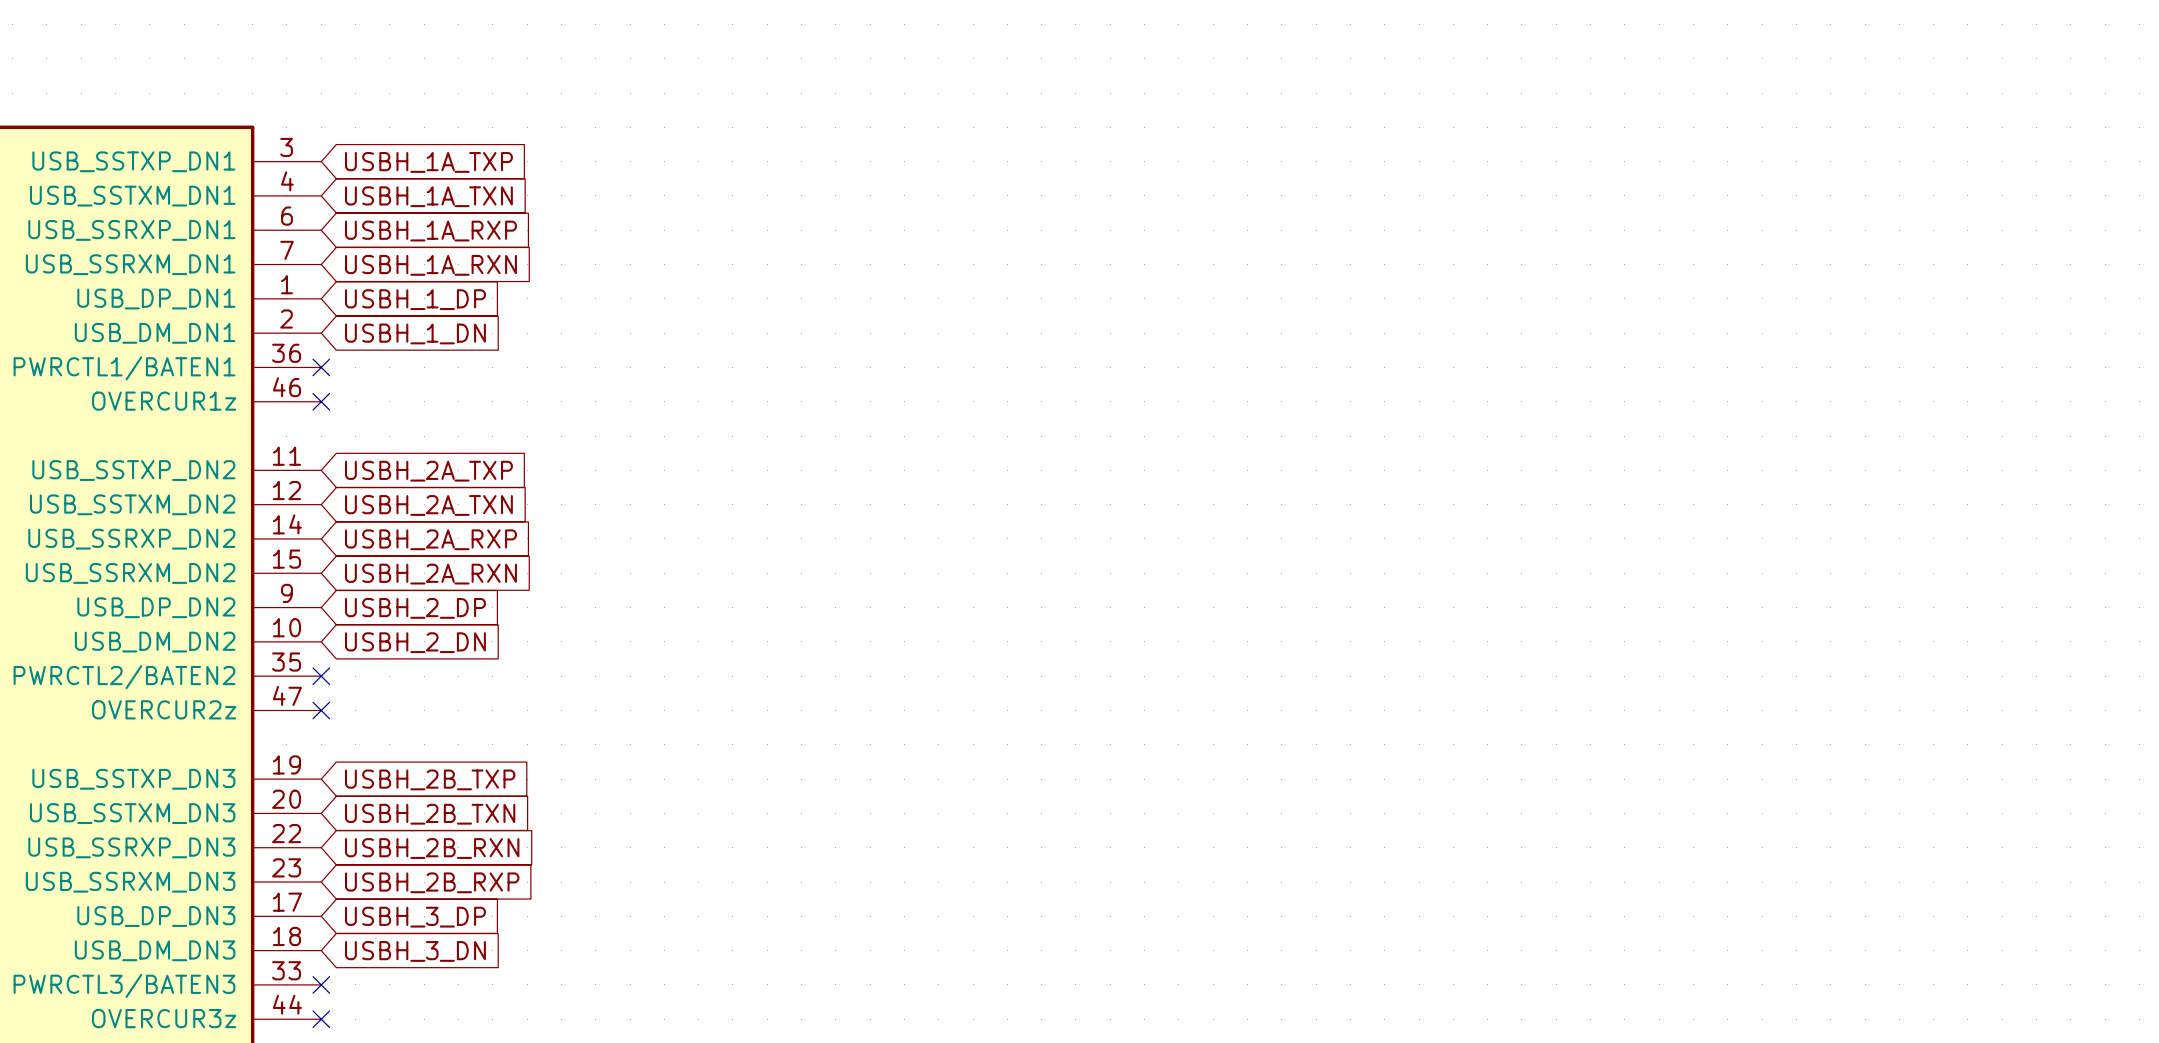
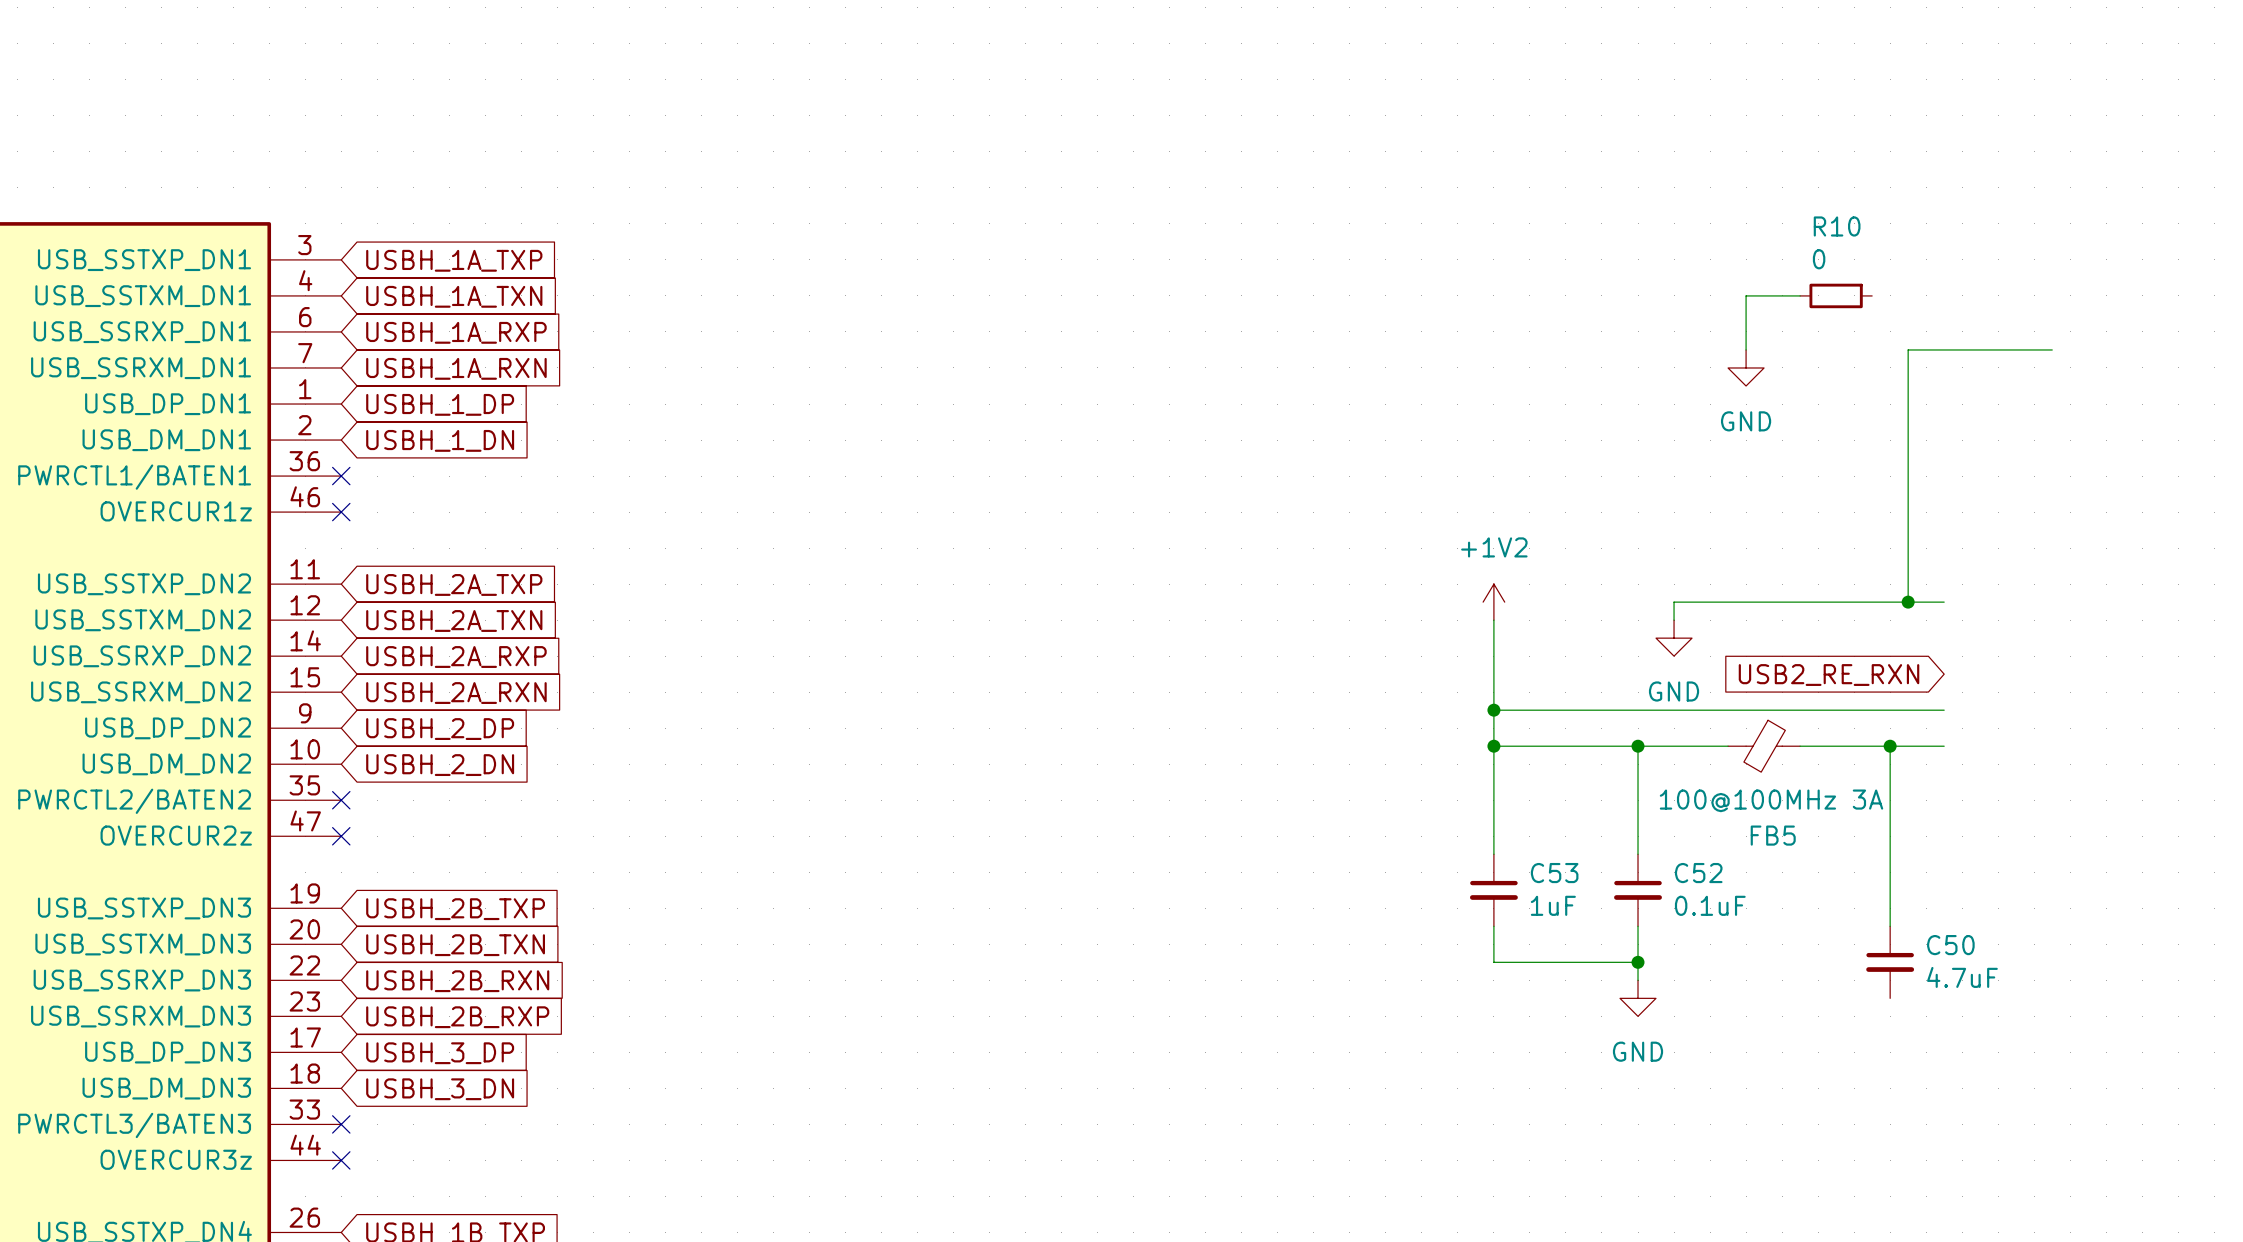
wire: none -> (1800, 295) (1746, 295) (1746, 349)
R10: none -> 0 (1836, 295)
wire: none -> (2052, 349) (1908, 349) (1908, 602)
power symbol: none -> GND (1746, 367)
power symbol: none -> +1V2 (1493, 602)
junction: none -> (1908, 602)
wire: none -> (1944, 602) (1674, 602) (1674, 620)
wire: none -> (1493, 620) (1493, 854)
power symbol: none -> GND (1674, 638)
global label: none -> USB2_RE_RXN (1829, 675)
wire: none -> (1493, 710) (1944, 710)
junction: none -> (1493, 710)
wire: none -> (1493, 746) (1728, 746)
junction: none -> (1493, 746)
wire: none -> (1638, 746) (1638, 854)
junction: none -> (1638, 746)
FB5: none -> 100@100MHz 3A (1764, 746)
wire: none -> (1800, 746) (1944, 746)
wire: none -> (1890, 746) (1890, 926)
junction: none -> (1890, 746)
C53: none -> 1uF (1493, 890)
C52: none -> 0.1uF (1638, 890)
wire: none -> (1493, 926) (1493, 962) (1638, 962)
wire: none -> (1638, 926) (1638, 980)
junction: none -> (1638, 962)
C50: none -> 4.7uF (1890, 962)
power symbol: none -> GND (1638, 998)

